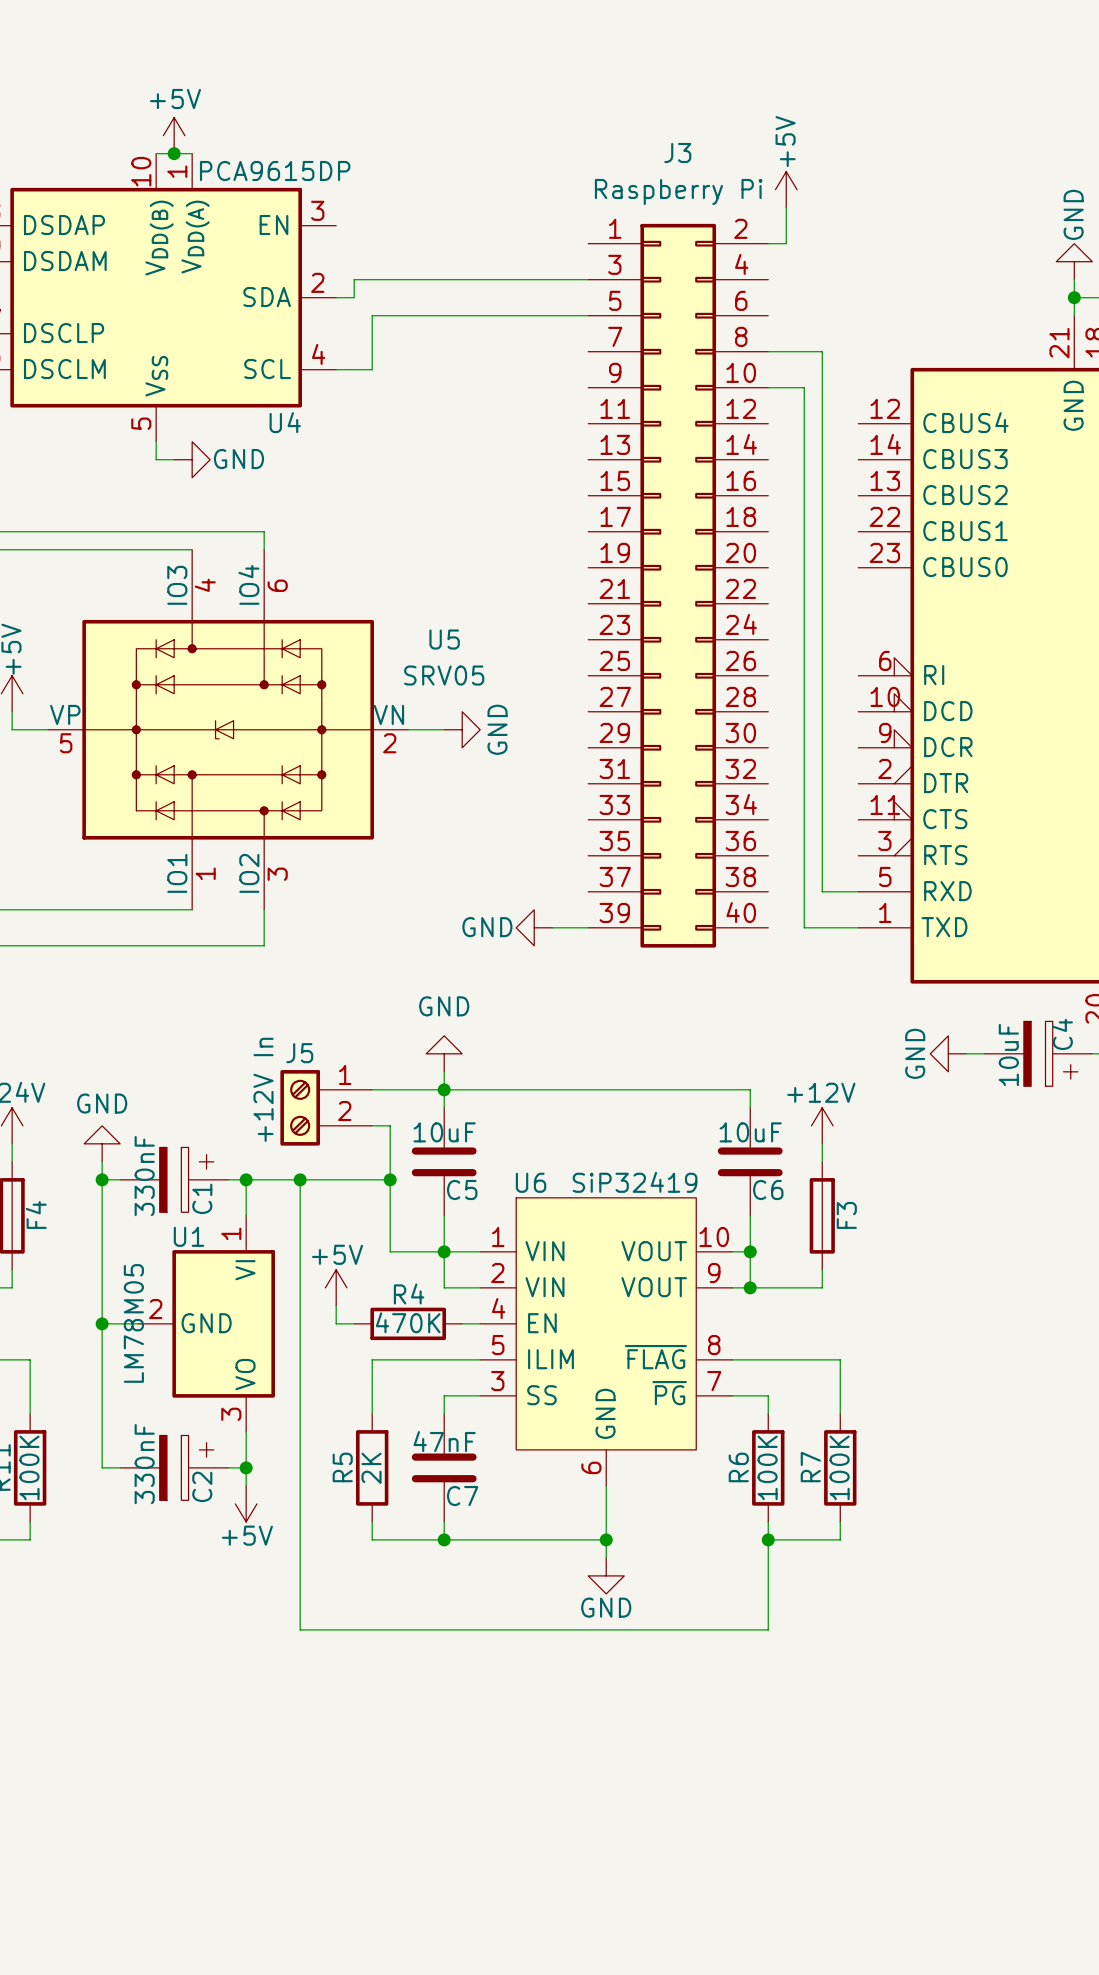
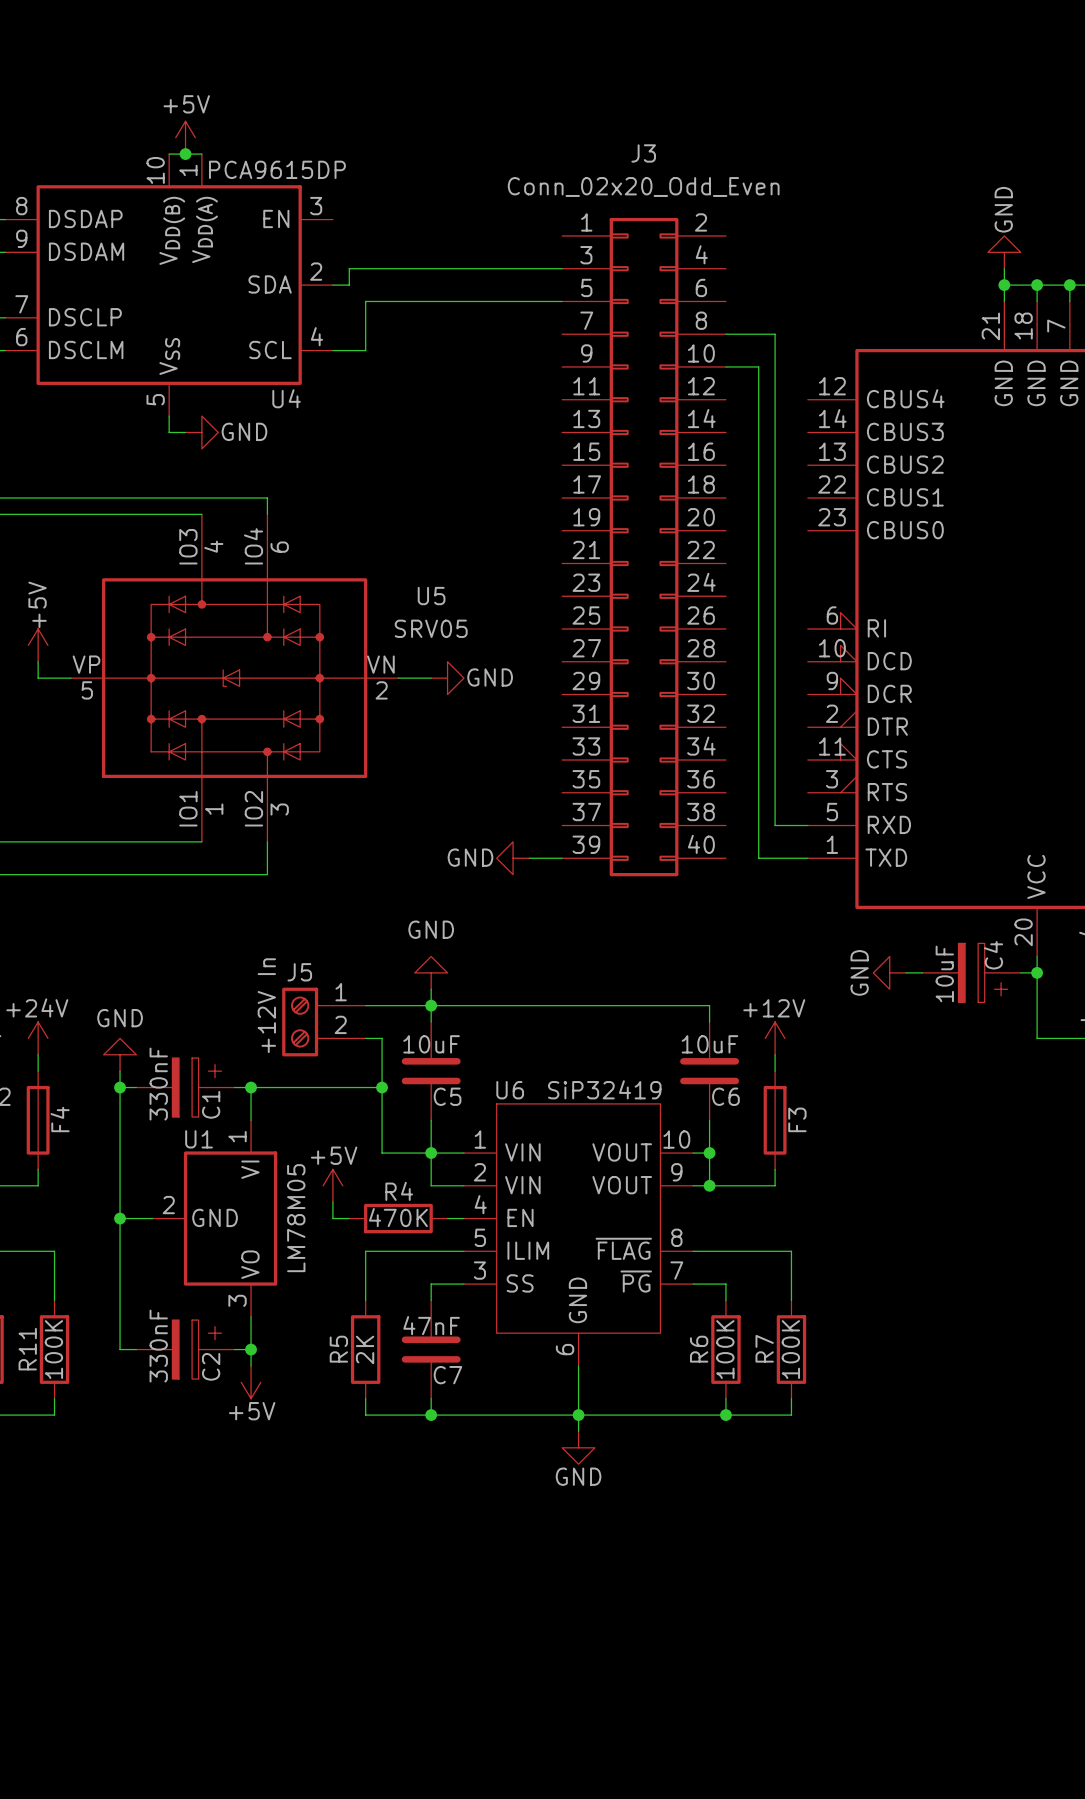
power symbol: +5V (786, 189) -> none
J3 value: Raspberry Pi (678, 192) -> Conn_02x20_Odd_Even (643, 187)
wire: (786, 207) (786, 243) (768, 243) -> none
power symbol text rotation: 0° (497, 729) -> 90° clockwise (490, 677)
wire: (300, 1179) (300, 1629) (768, 1629) (768, 1539) -> (578, 1415) (725, 1415)
junction: (300, 1179) -> none
U1 value position: LM78M05 (133, 1323) -> LM78M05 (296, 1218)

